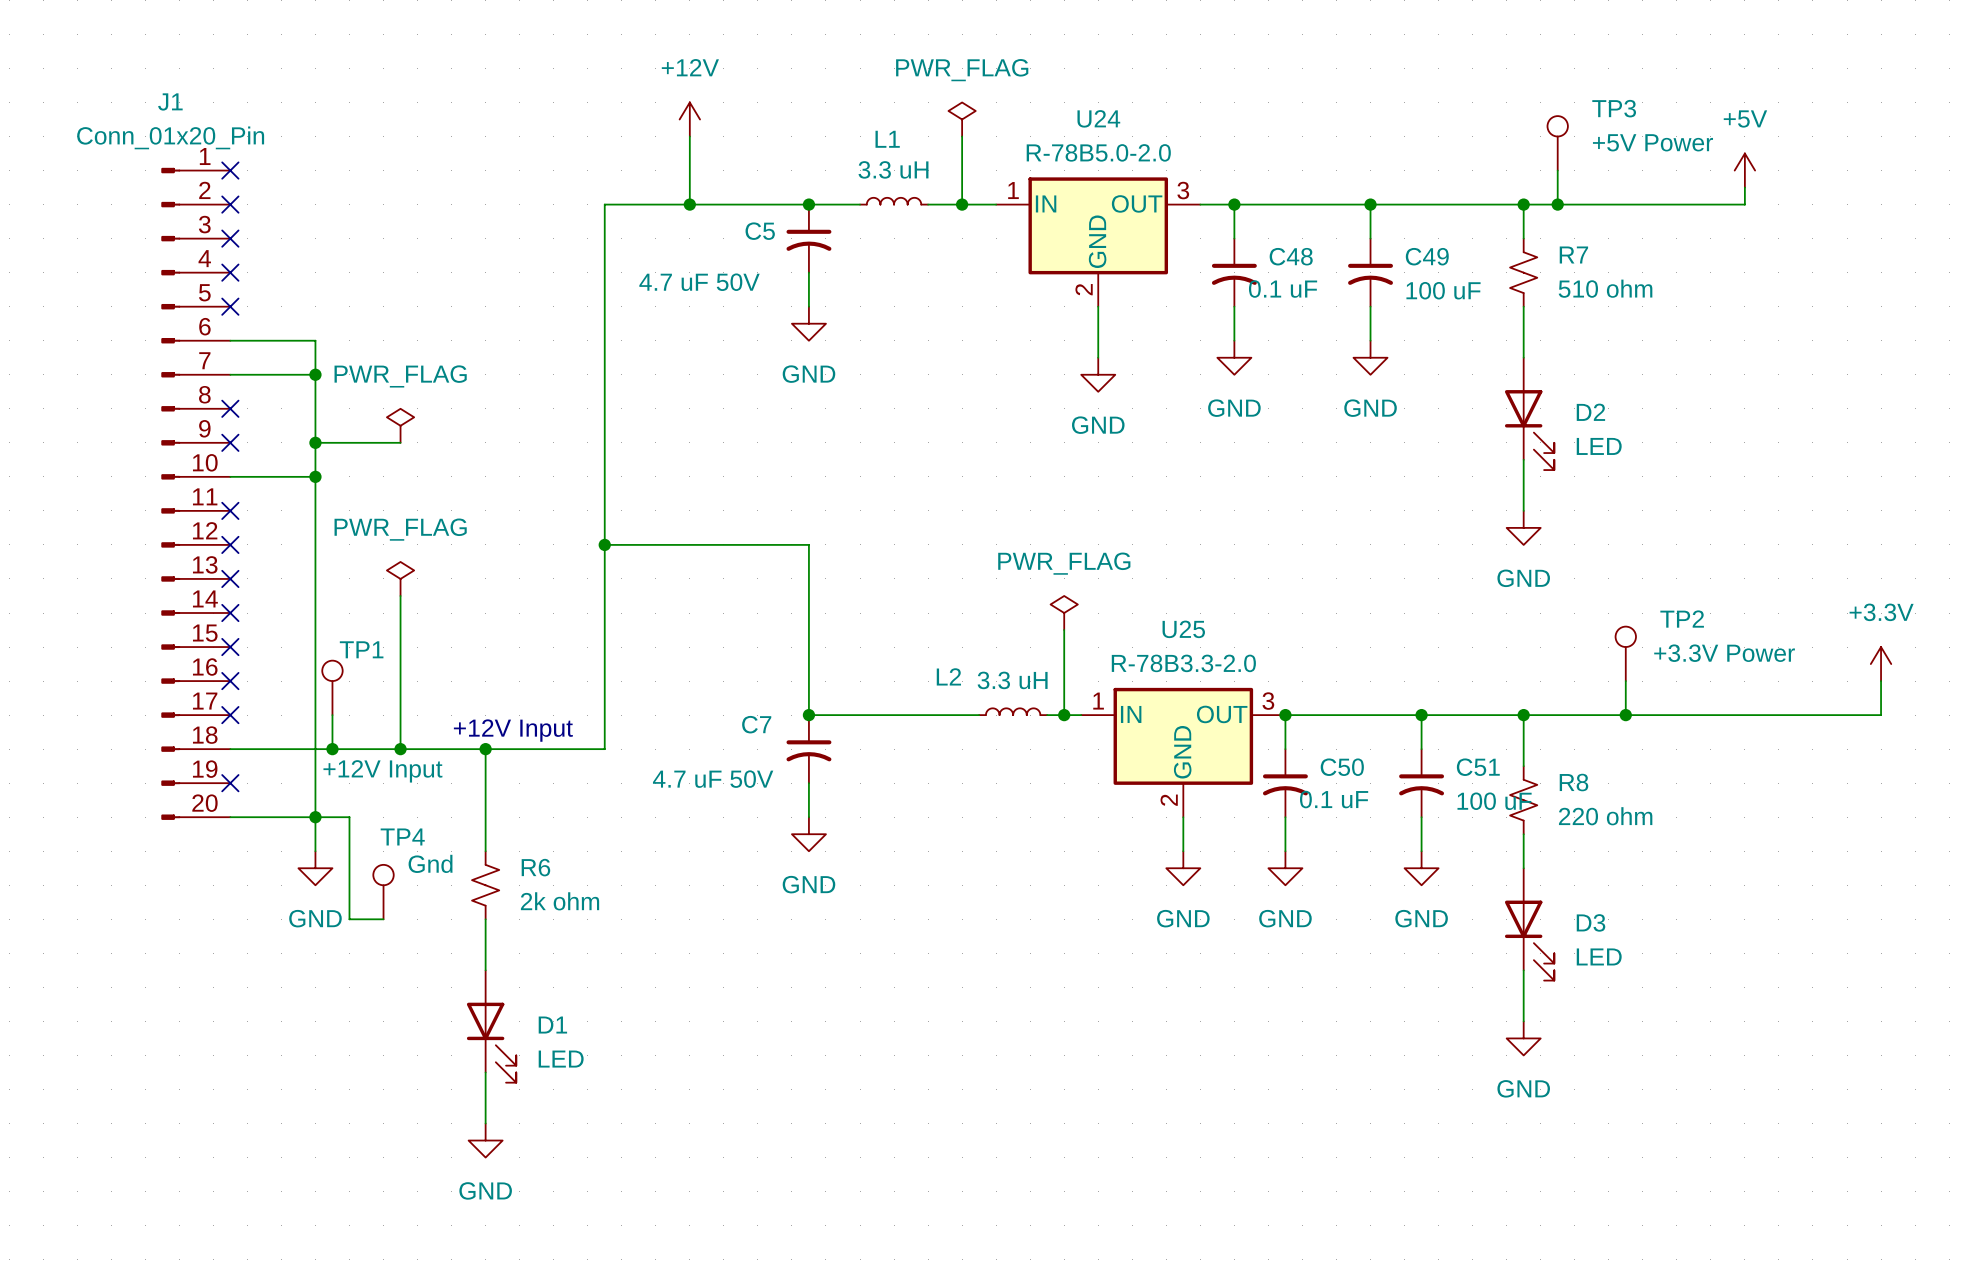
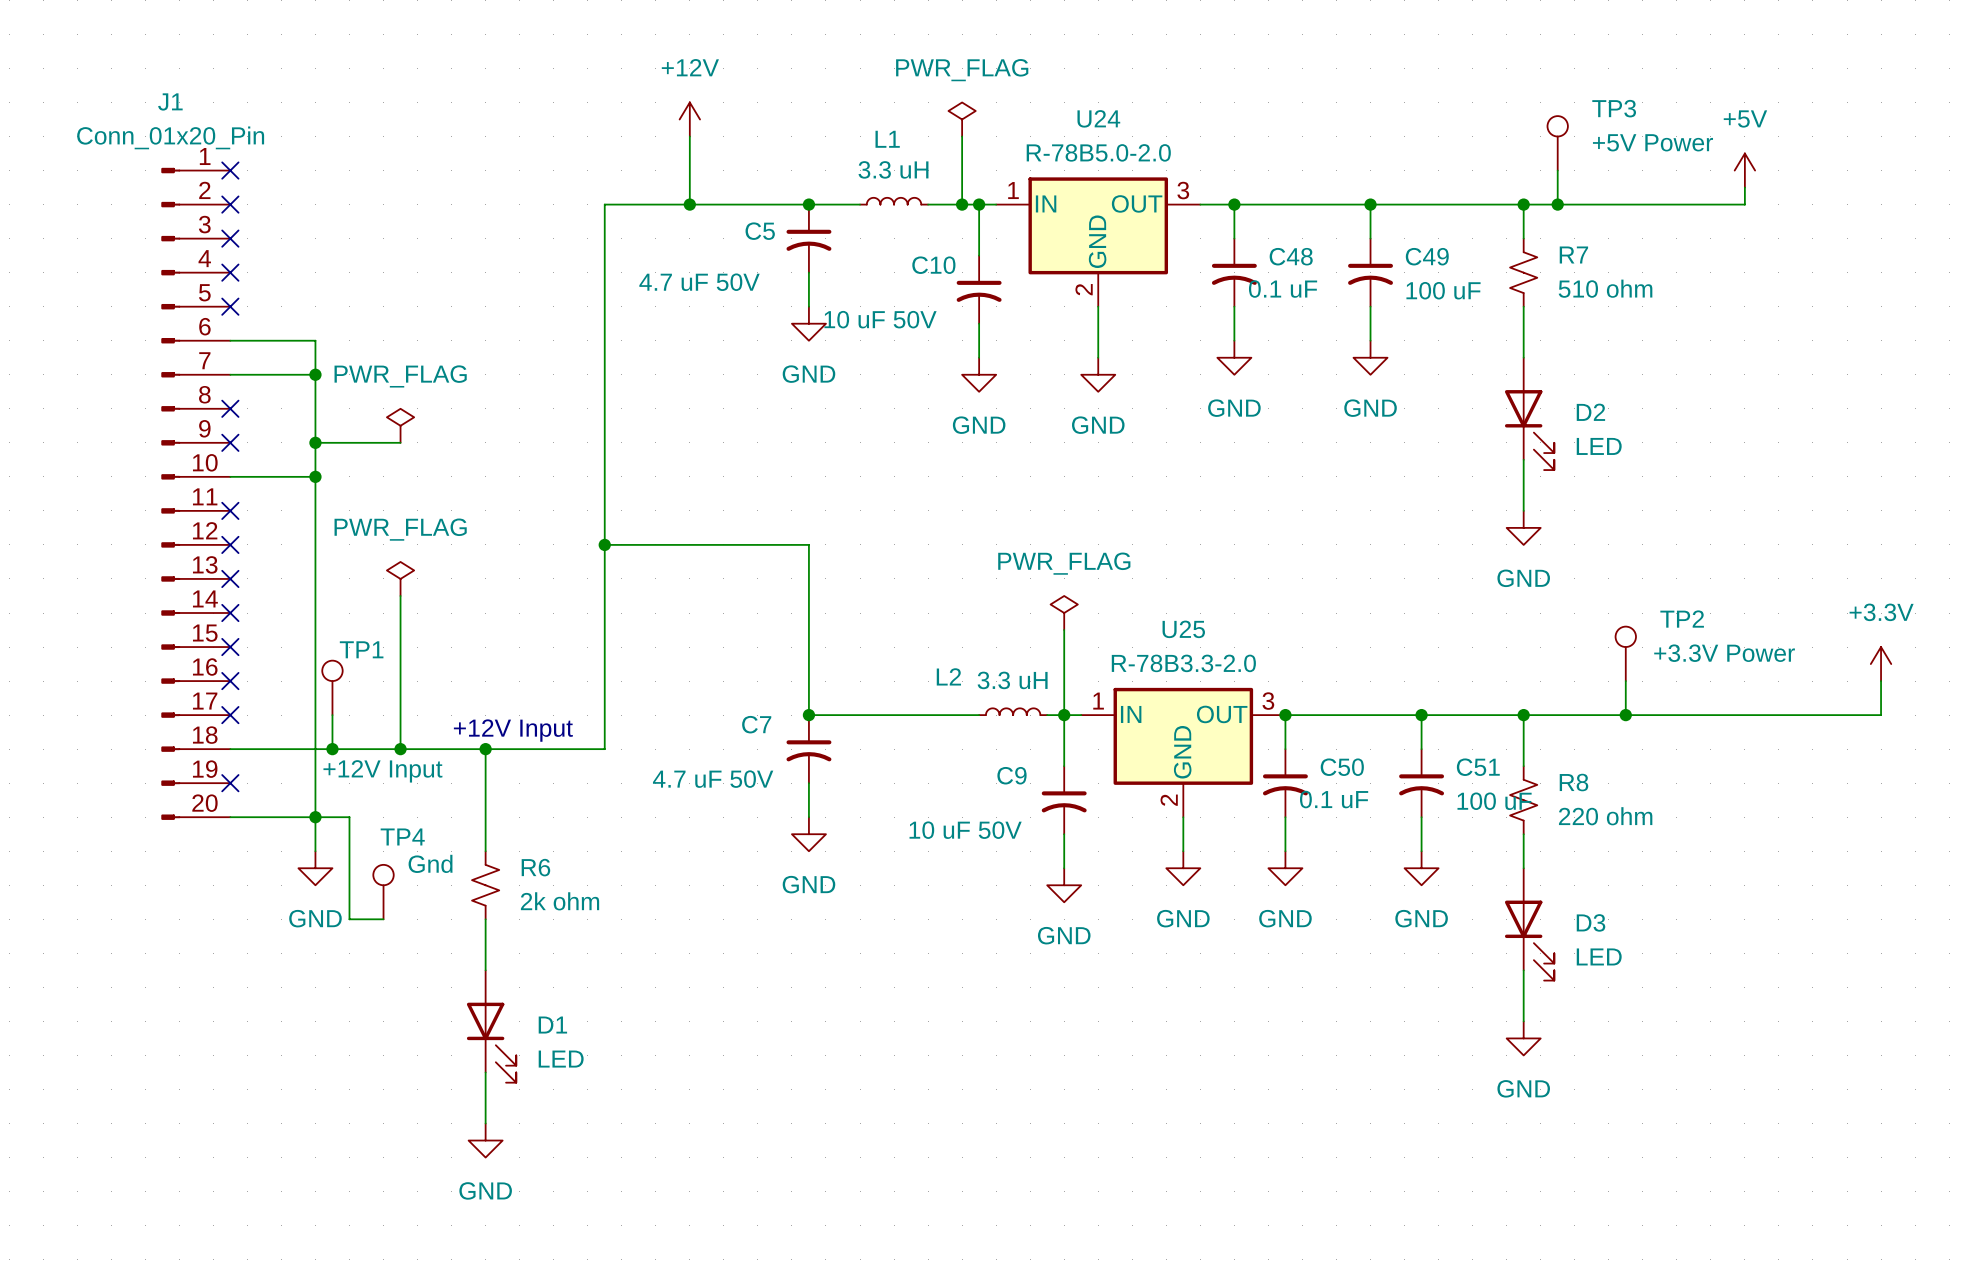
wire: none -> (979, 204) (979, 255)
junction: none -> (979, 204)
C10: none -> 10 uF 50V (979, 289)
wire: none -> (979, 323) (979, 357)
power symbol: none -> GND (979, 374)
wire: none -> (1064, 715) (1064, 766)
C9: none -> 10 uF 50V (1064, 800)
wire: none -> (1064, 834) (1064, 868)
power symbol: none -> GND (1064, 885)

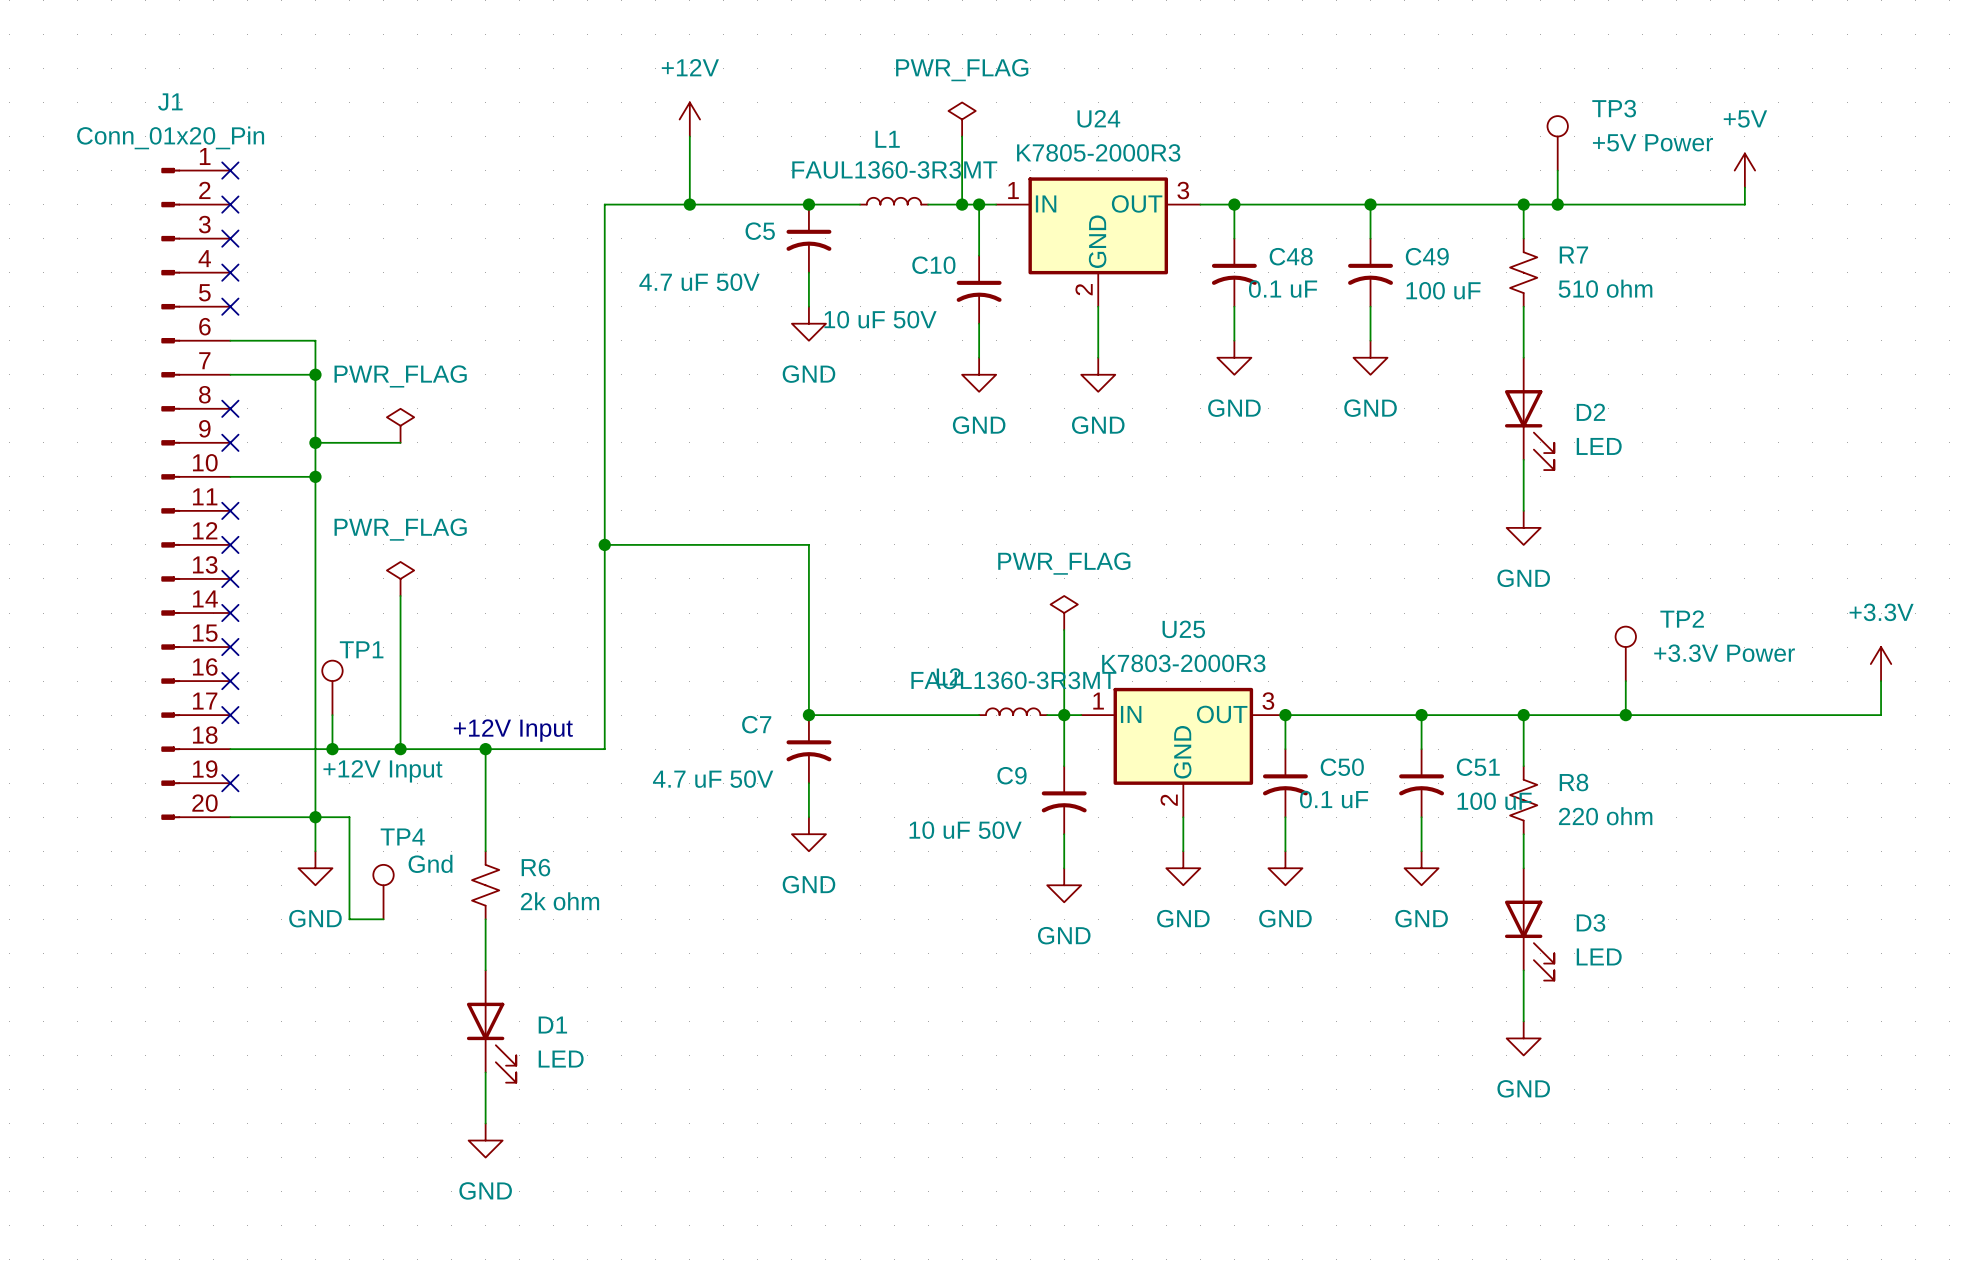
U24 value: R-78B5.0-2.0 (1098, 152) -> K7805-2000R3 (1098, 152)
L1 value: 3.3 uH (893, 169) -> FAUL1360-3R3MT (894, 169)
U25 value: R-78B3.3-2.0 (1183, 663) -> K7803-2000R3 (1183, 663)
L2 value: 3.3 uH (1012, 680) -> FAUL1360-3R3MT (1013, 680)

